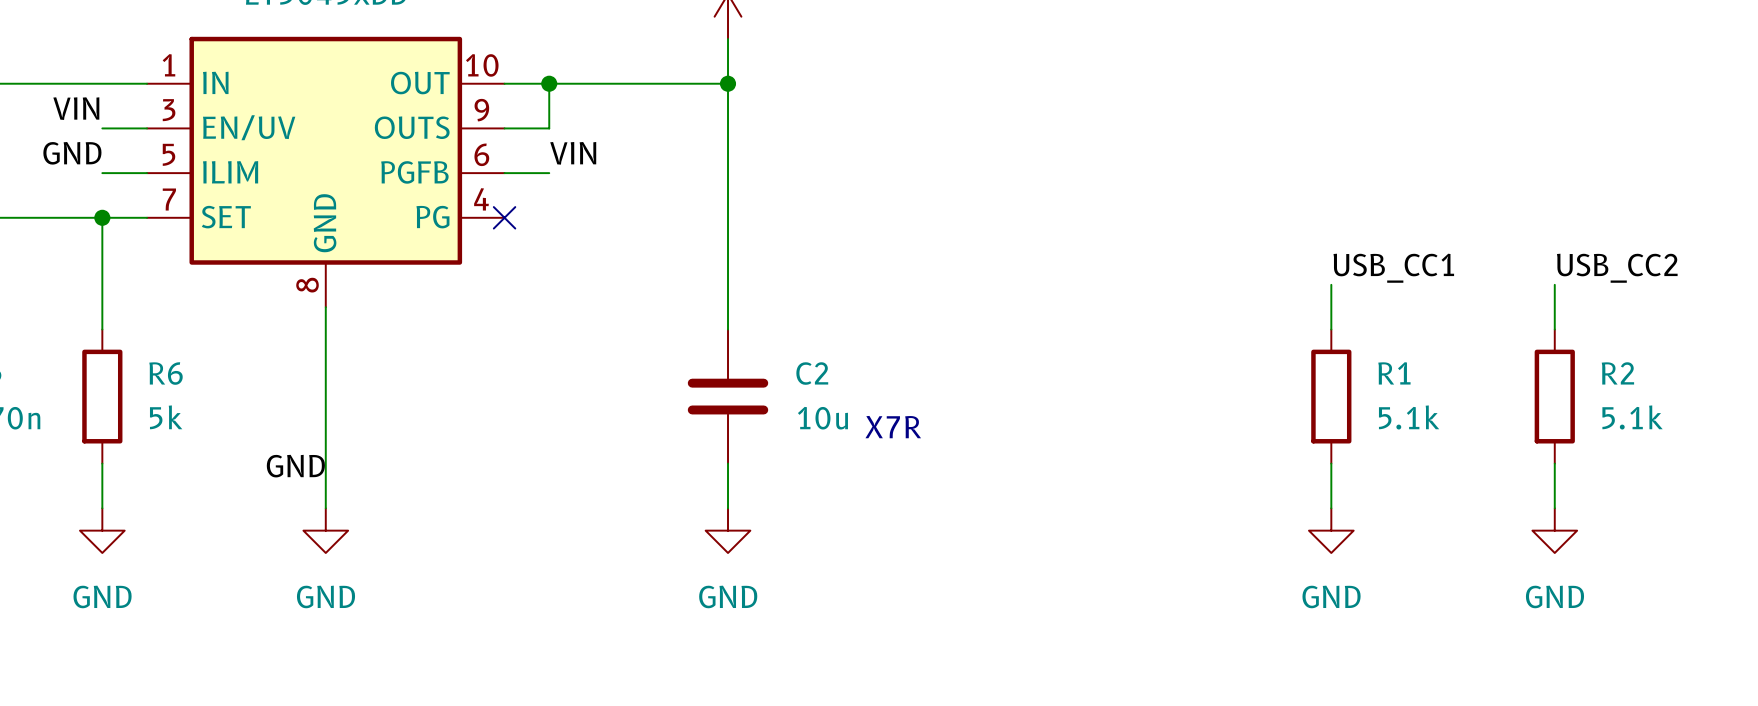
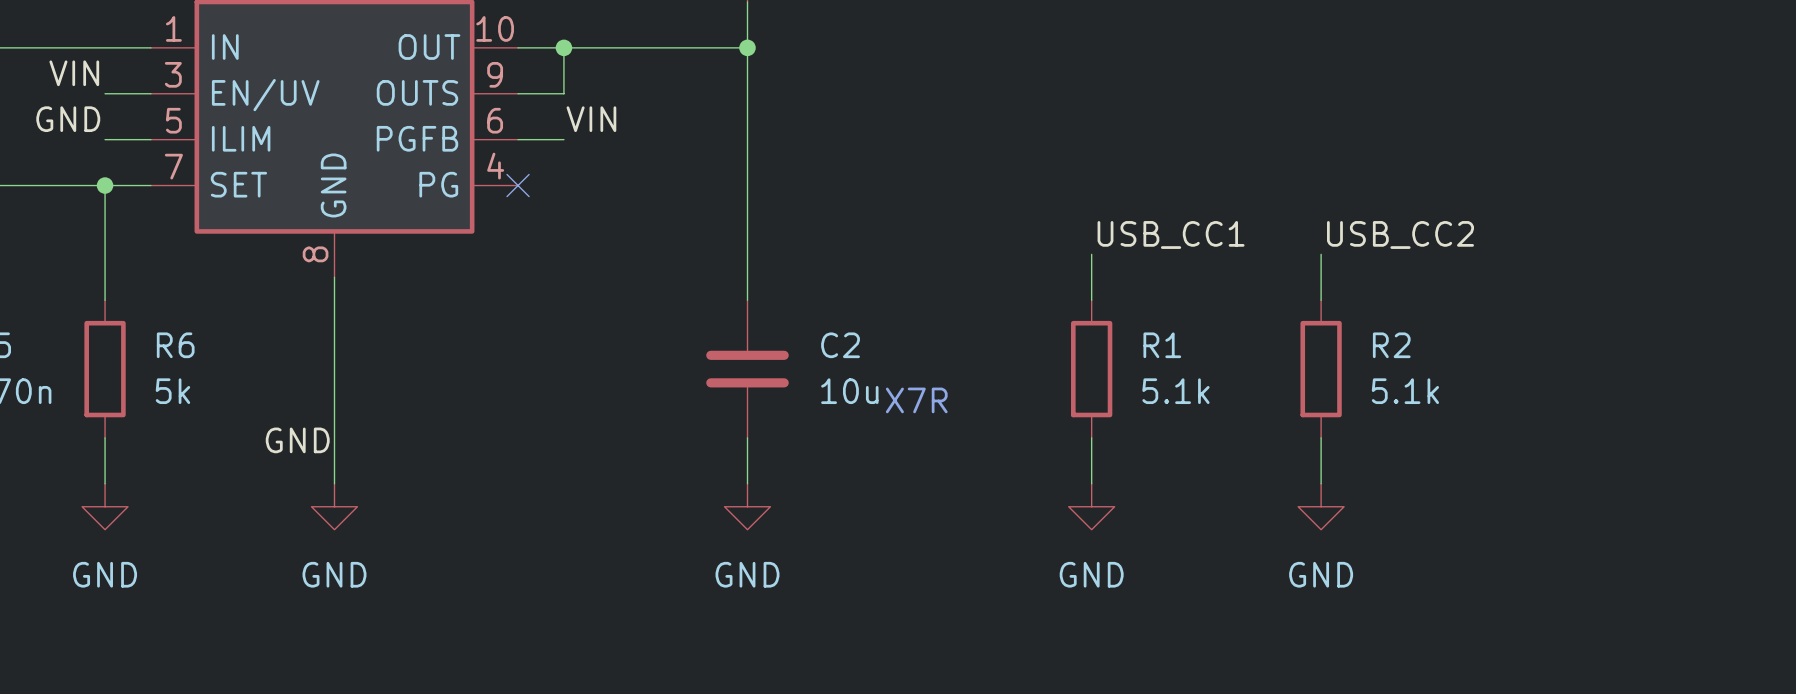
label position: USB_CC1 (1393, 268) -> USB_CC1 (1171, 234)
label position: USB_CC2 (1617, 268) -> USB_CC2 (1400, 234)
wire: (1331, 284) (1331, 329) -> (1091, 254) (1091, 300)
wire: (1554, 284) (1554, 329) -> (1321, 254) (1321, 300)
R1 position: (1331, 396) -> (1091, 369)
R2 position: (1554, 396) -> (1321, 369)
wire: (1331, 463) (1331, 508) -> (1091, 437) (1091, 483)
wire: (1554, 463) (1554, 508) -> (1321, 437) (1321, 483)
power symbol: none -> GND (1091, 506)
power symbol position: GND (1331, 530) -> GND (1321, 506)
power symbol: GND (1554, 530) -> none

